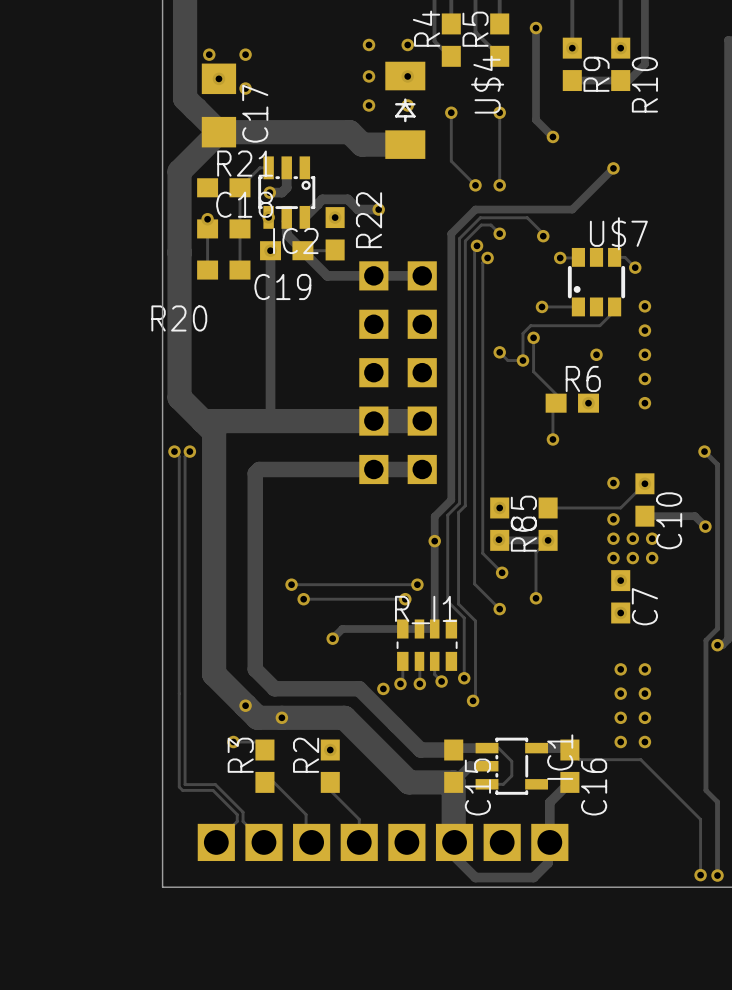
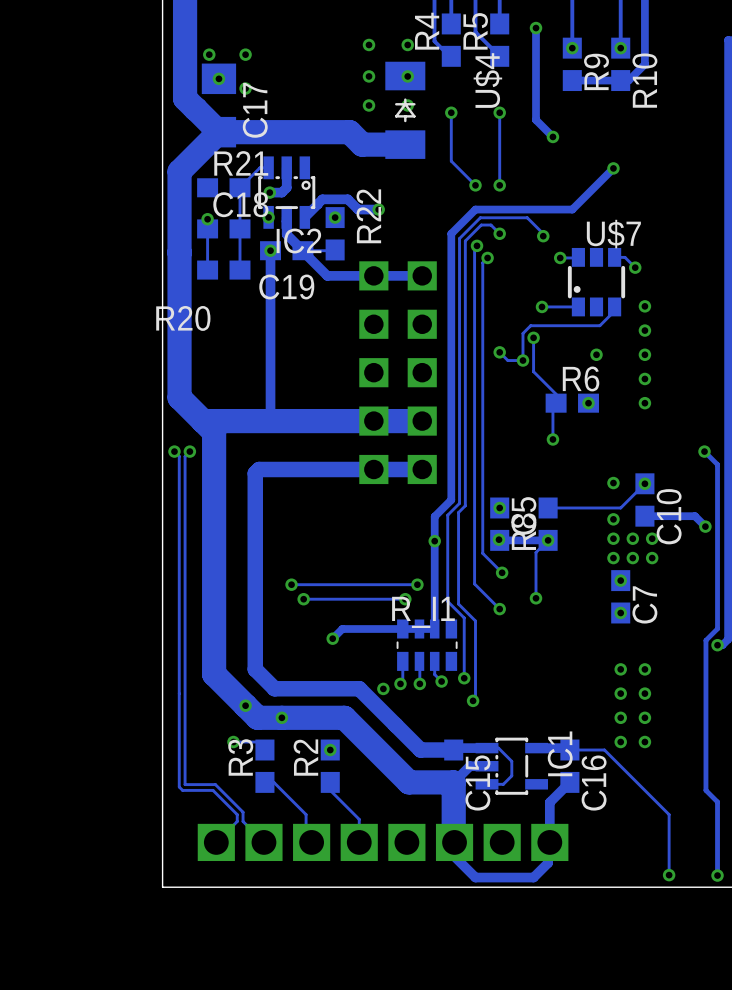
track: (569, 750) (579, 759) (640, 759) (700, 819) (700, 875) -> (569, 750) (604, 750) (669, 814) (669, 875)
via position: (700, 875) -> (669, 875)

